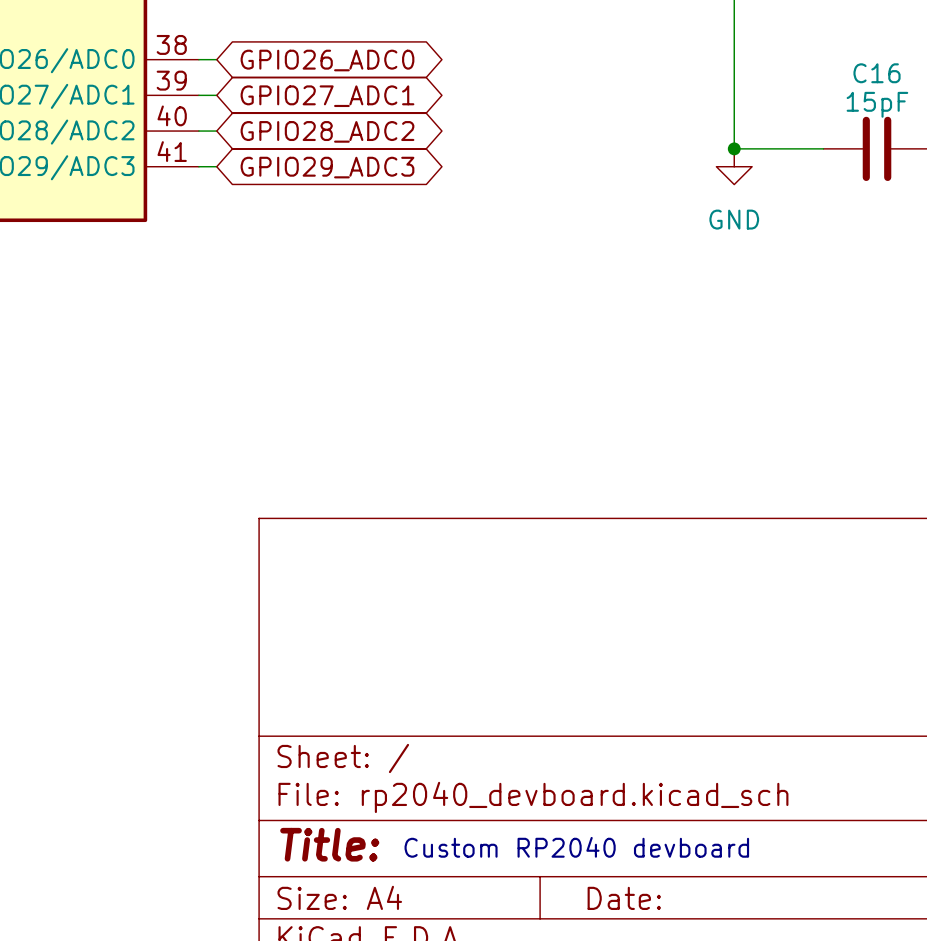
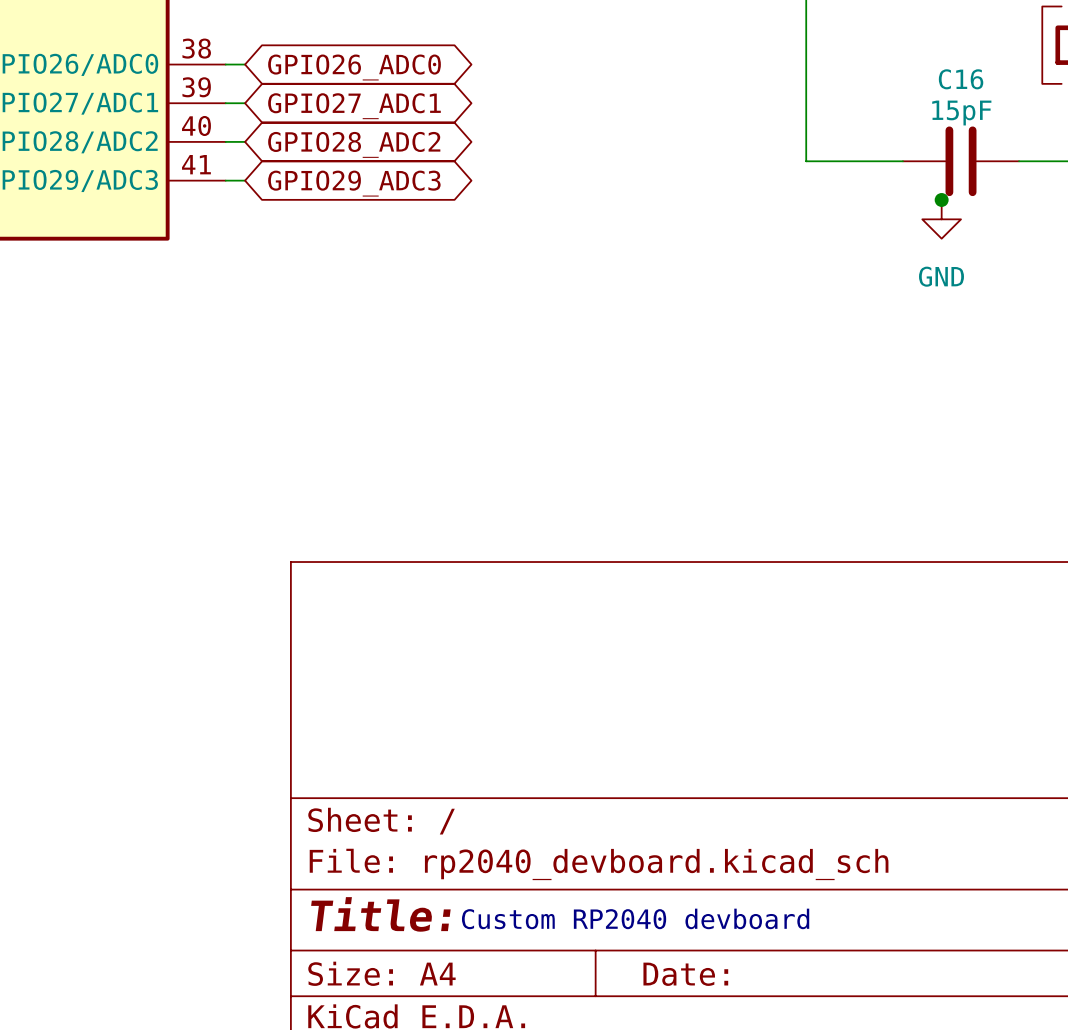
junction: (734, 148) -> none
power symbol position: GND (734, 166) -> GND (941, 219)
junction: none -> (941, 199)

